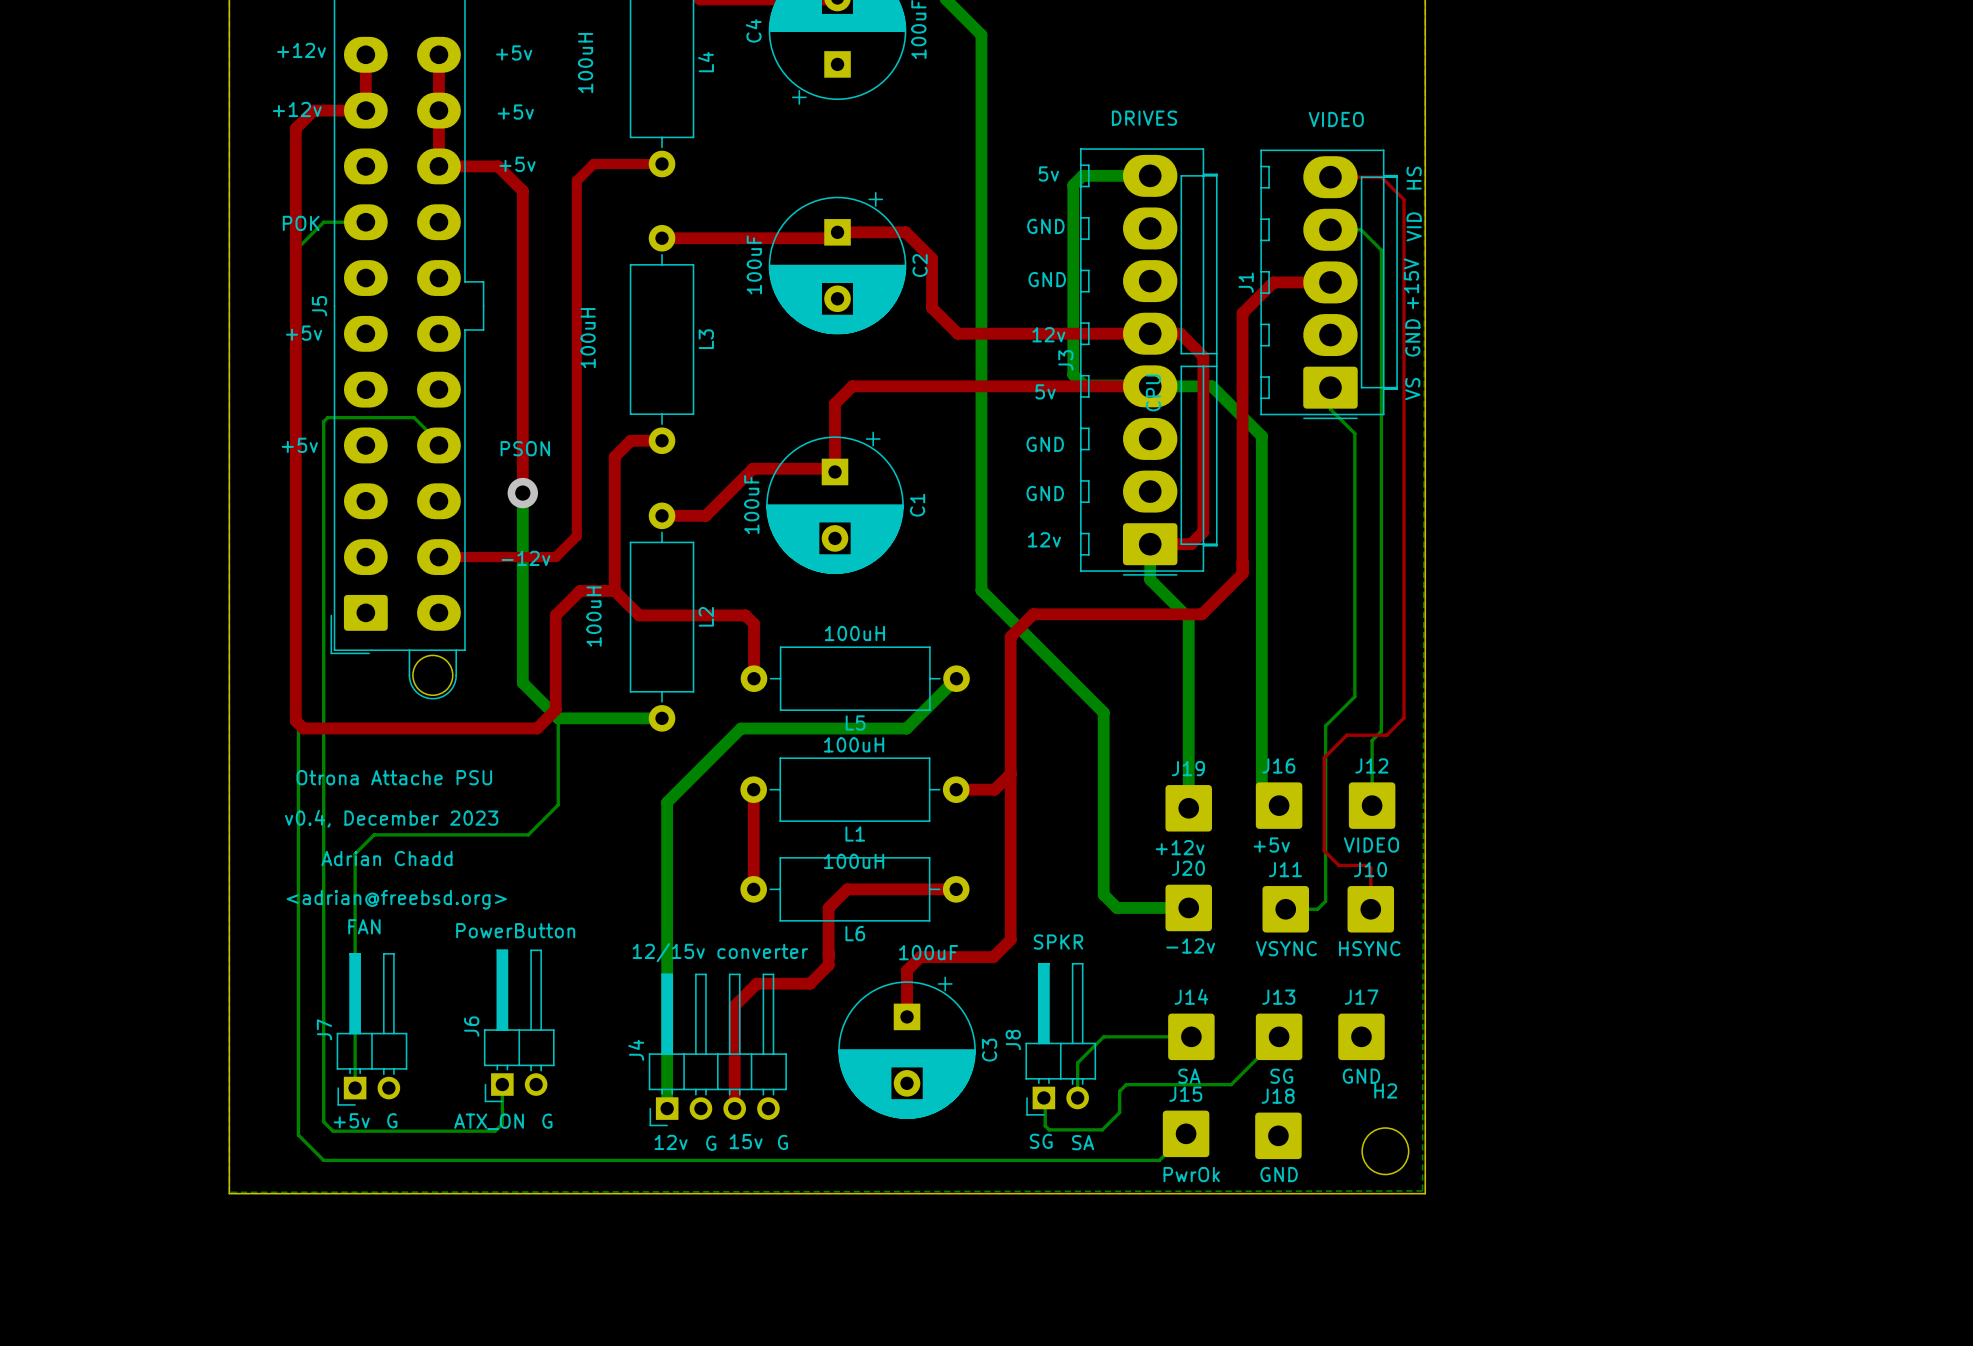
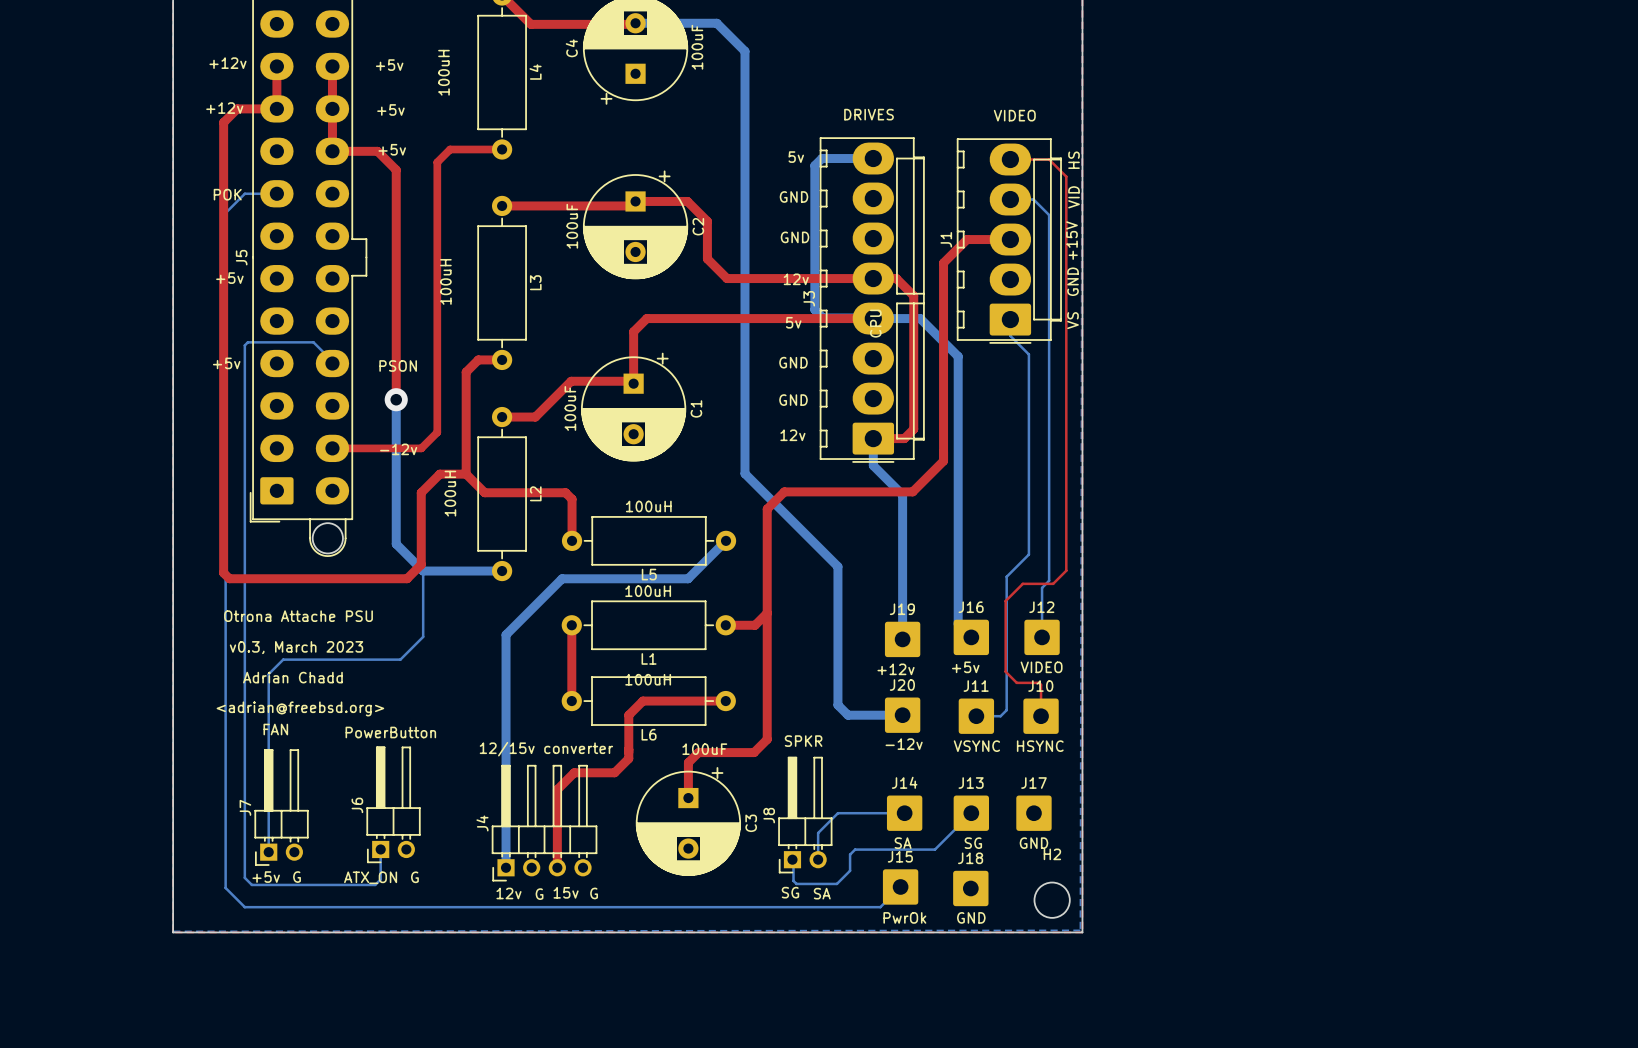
text: v0.4, December 2023 (391, 818) -> v0.3, March 2023 (296, 647)

